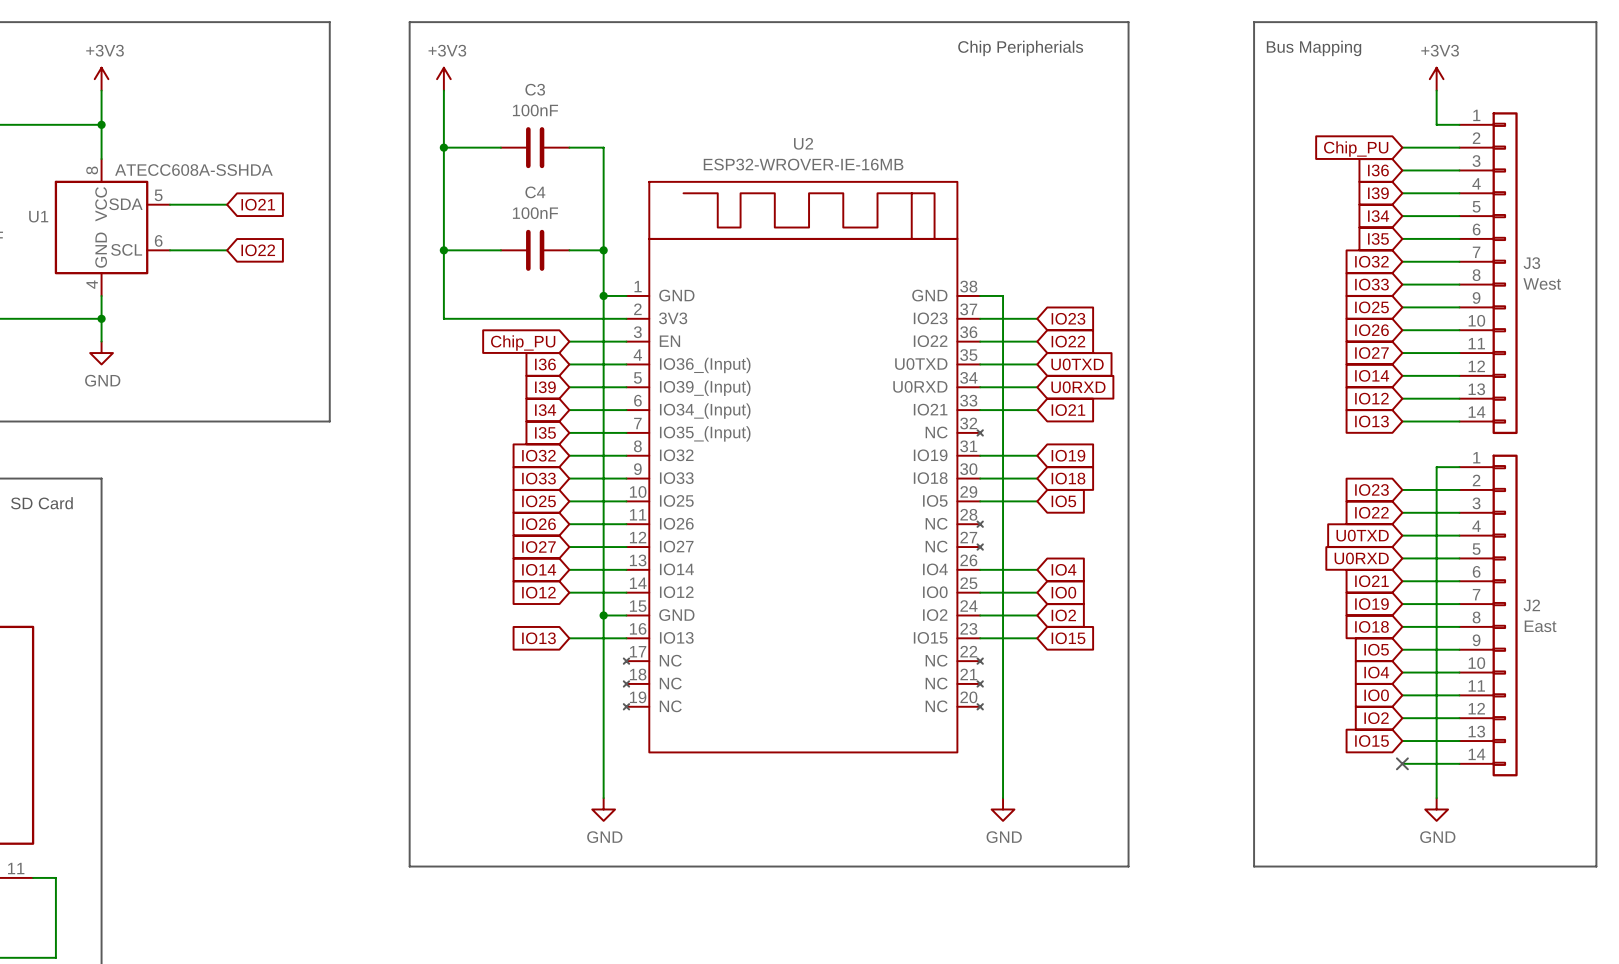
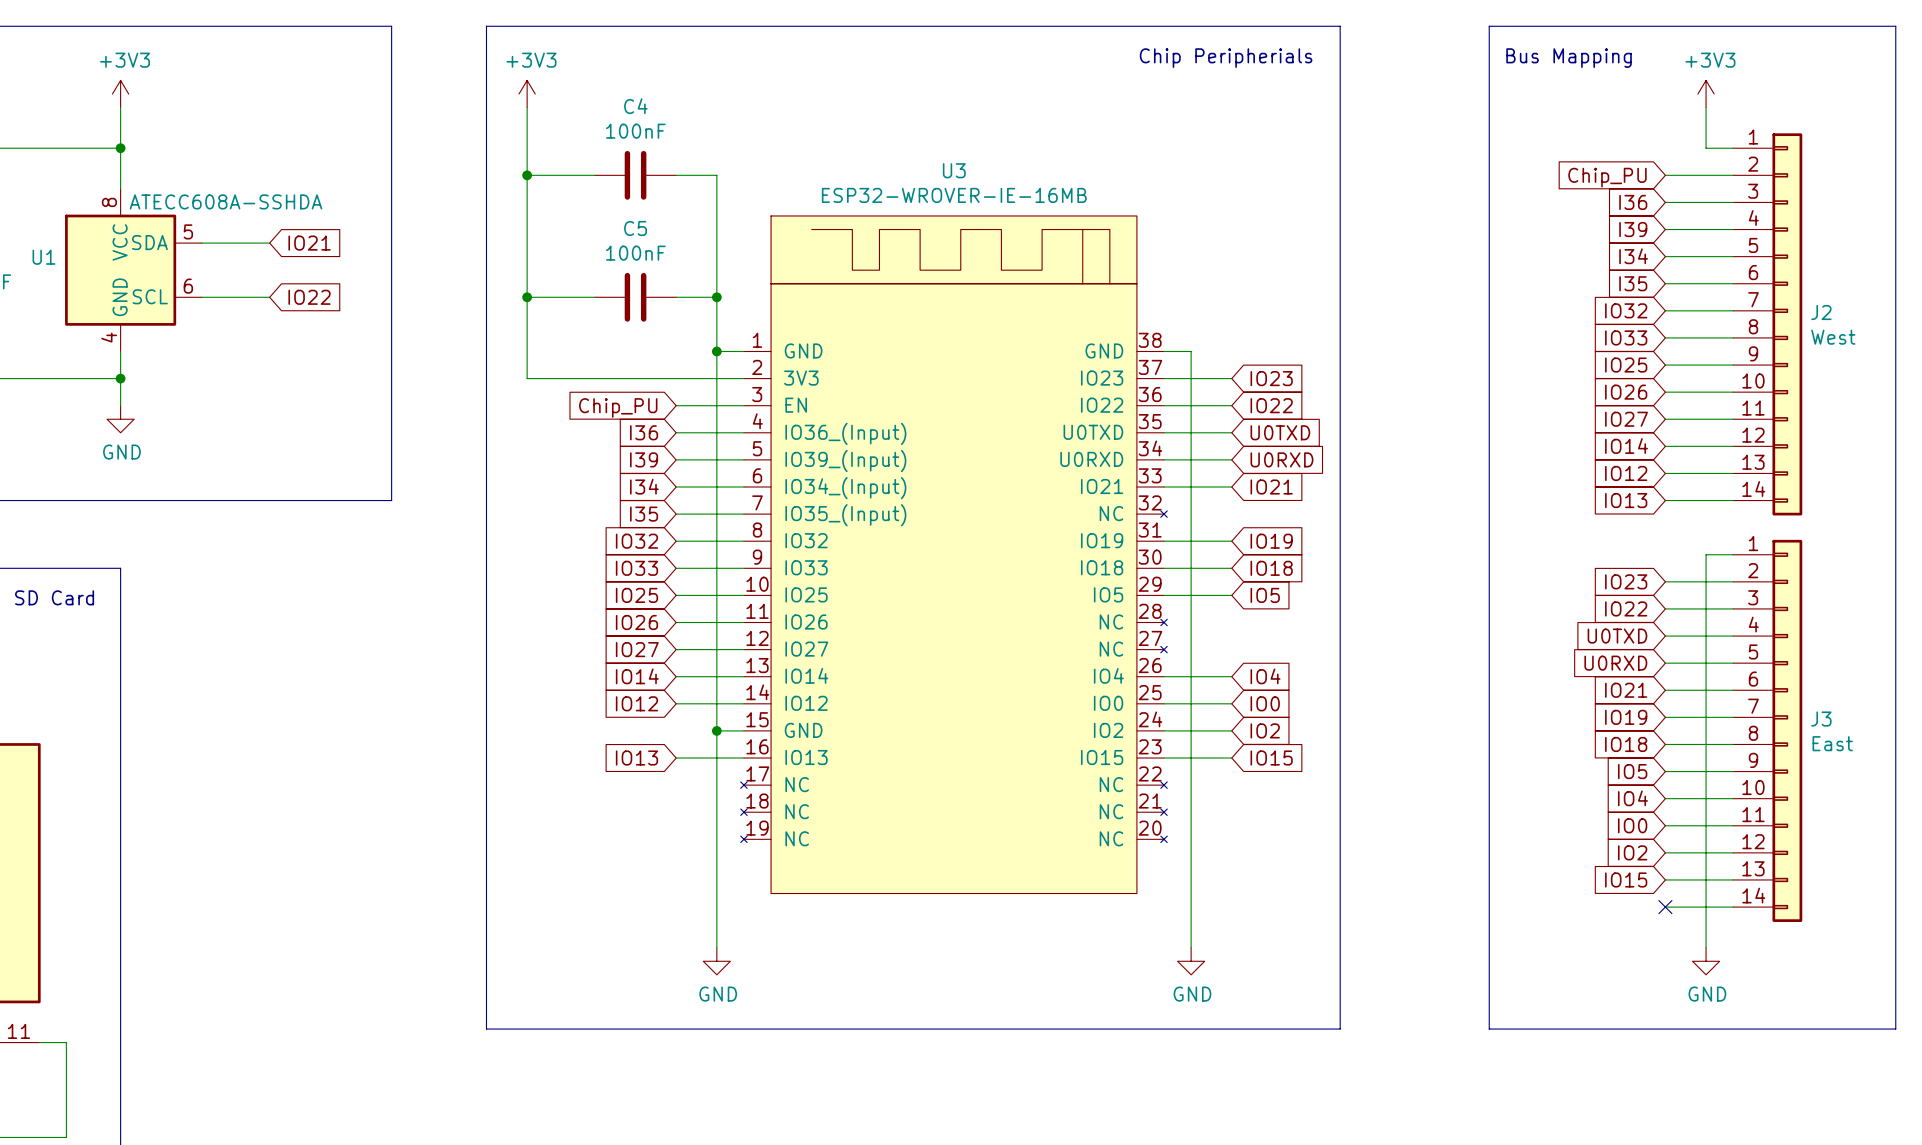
C3 name: C3 (535, 89) -> C4 (635, 106)
U2 name: U2 (803, 143) -> U3 (954, 170)
C4 name: C4 (535, 192) -> C5 (635, 228)
J3 name: J3 (1531, 263) -> J2 (1821, 312)
J2 name: J2 (1531, 605) -> J3 (1821, 719)

